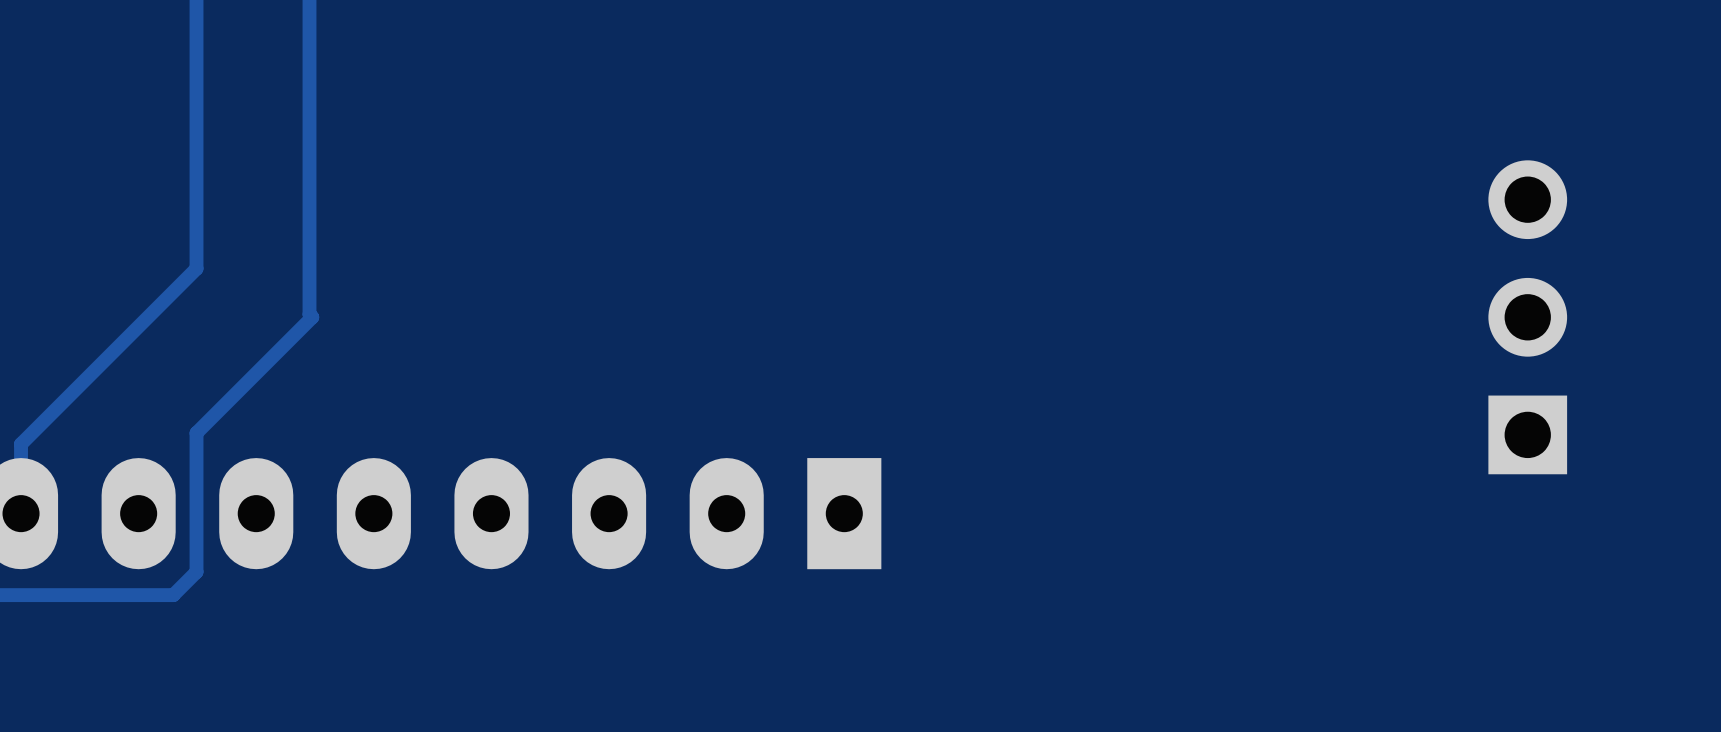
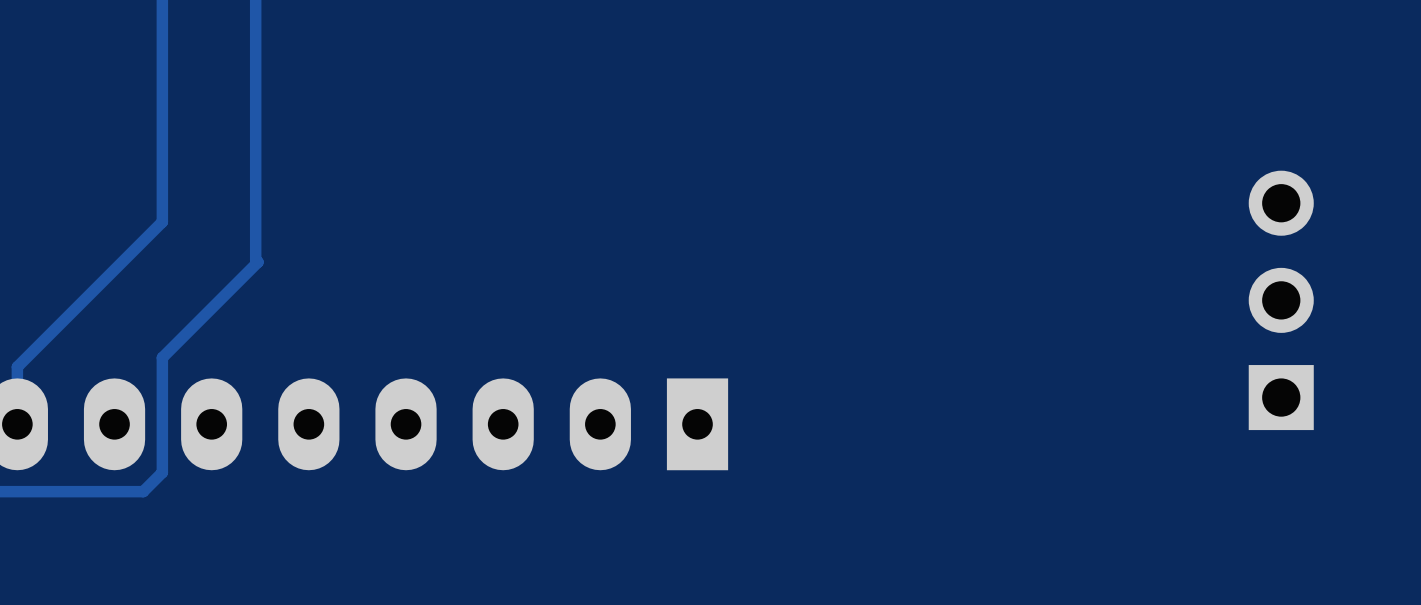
part position: (1527, 317) -> (1281, 300)

